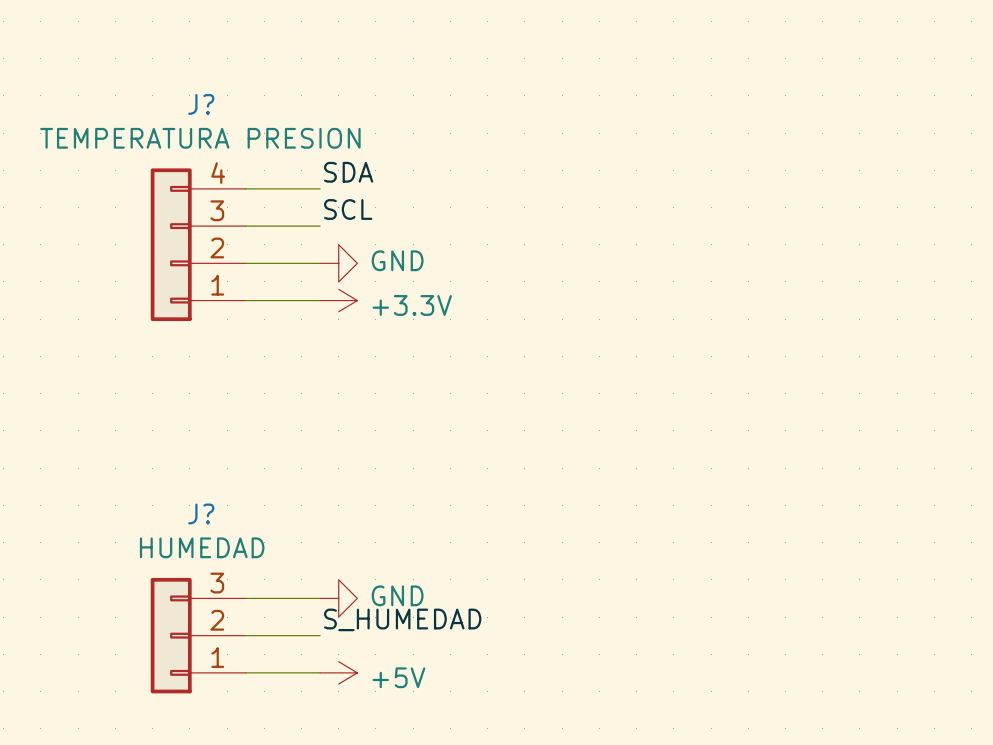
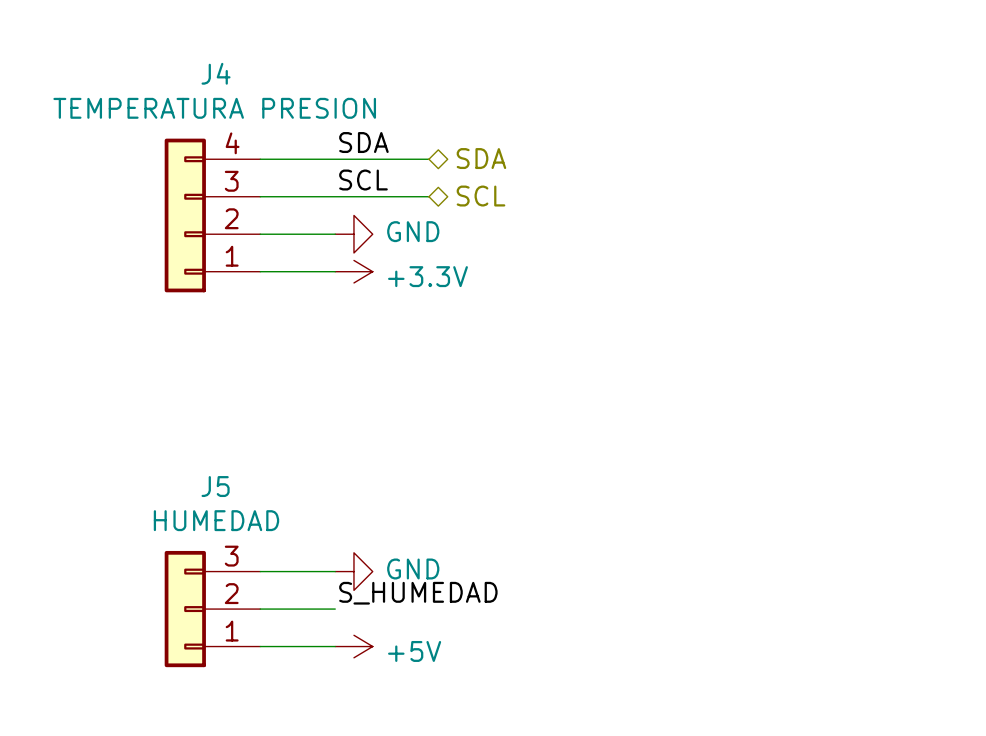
J? name: J? (201, 104) -> J4 (216, 73)
wire: none -> (335, 159) (428, 159)
hierarchical label: none -> SDA (481, 158)
hierarchical label: none -> SCL (481, 196)
wire: none -> (335, 196) (428, 196)
J? name: J? (201, 513) -> J5 (215, 486)

